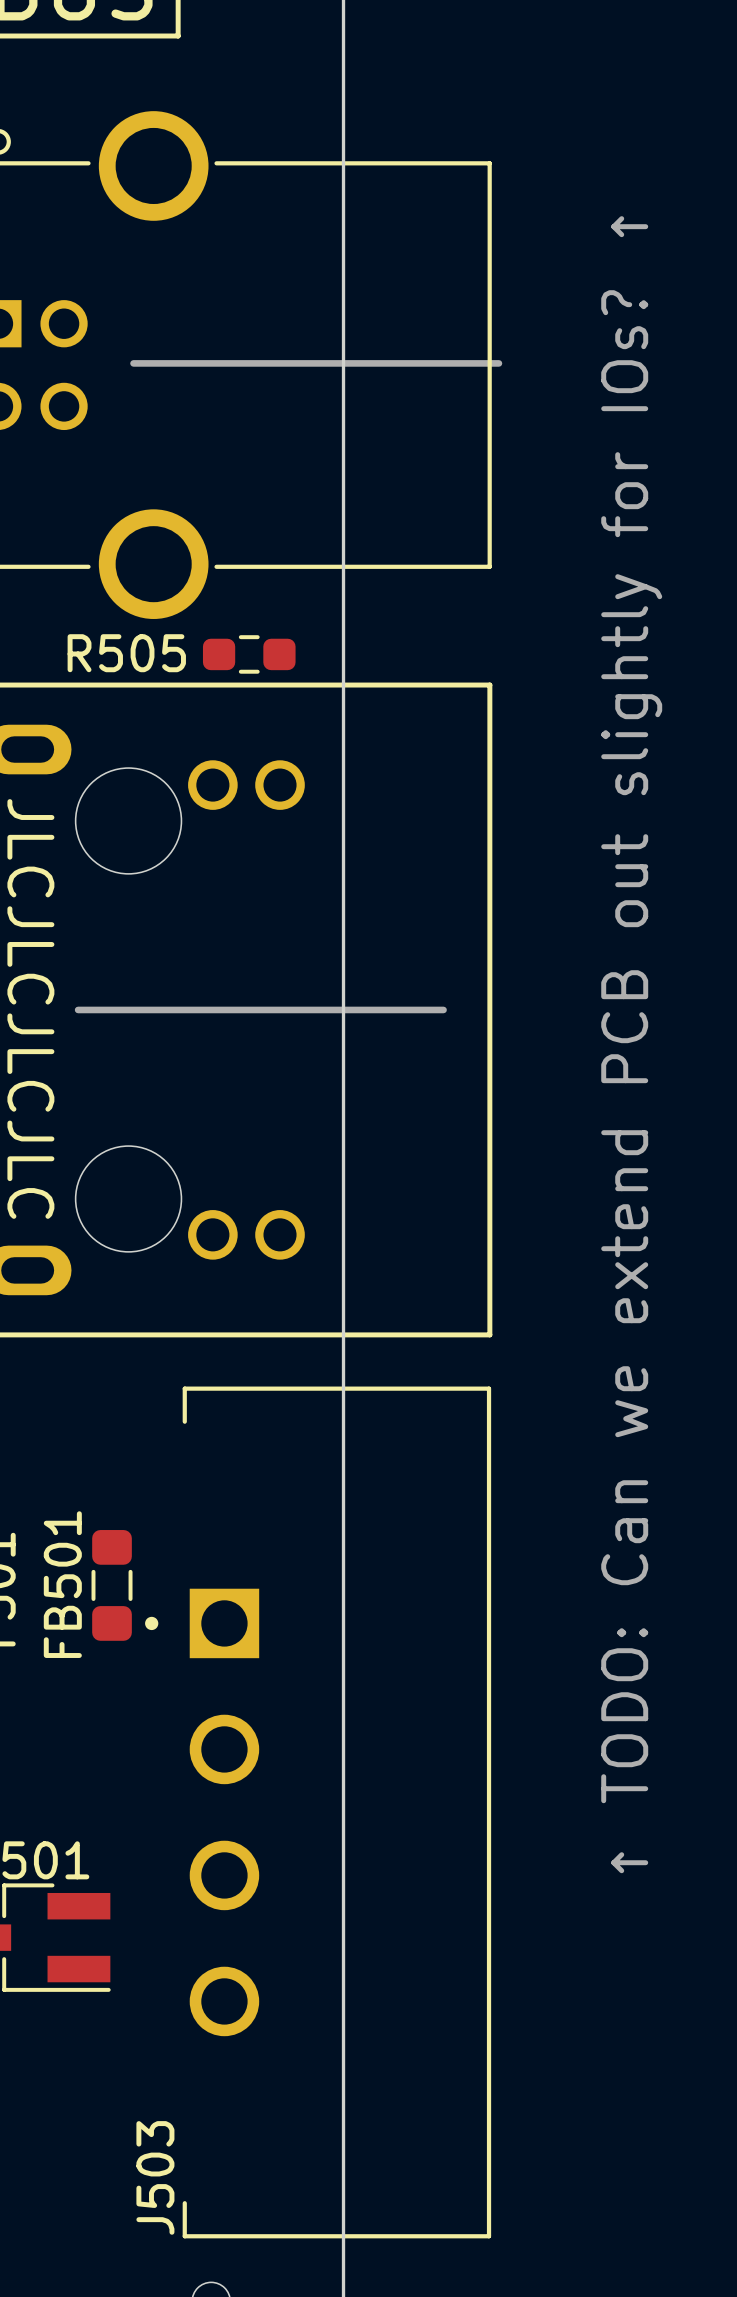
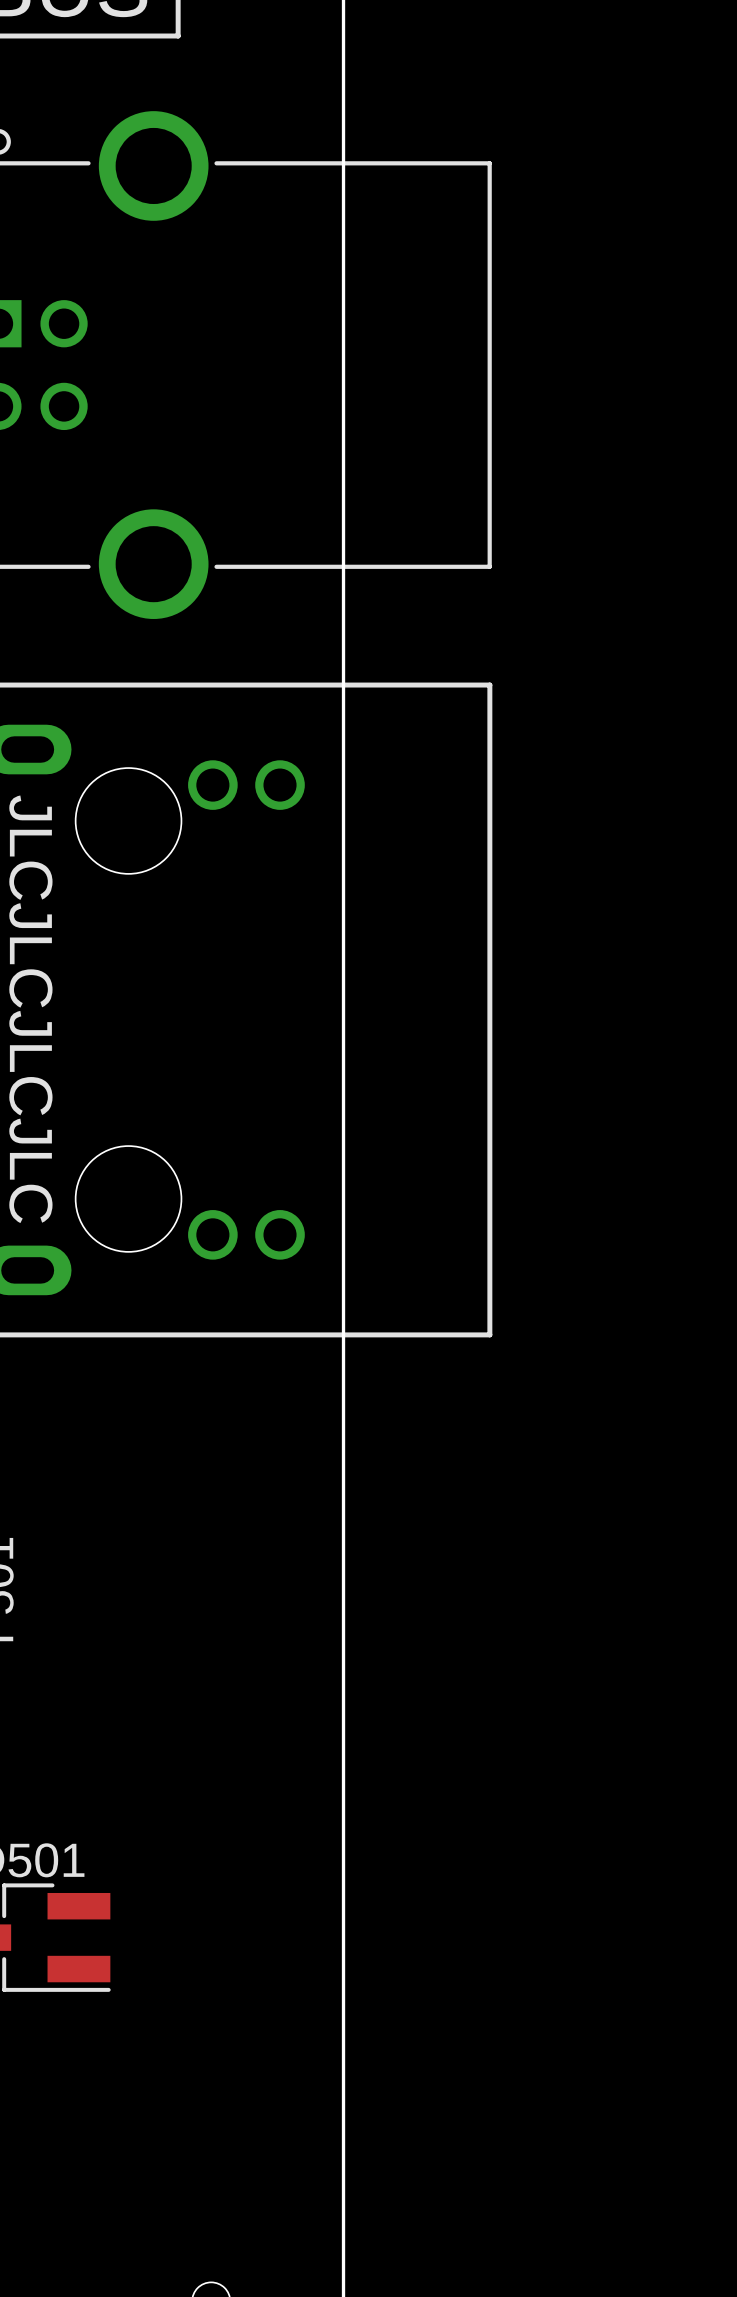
line: (133, 363) (498, 363) -> none
R505: (249, 654) -> none
line: (78, 1009) (443, 1009) -> none
text: ↑ TODO: Can we extend PCB out slightly for IOs? ↑ (631, 1044) -> none
FB501: (112, 1585) -> none
J503: (318, 1812) -> none

